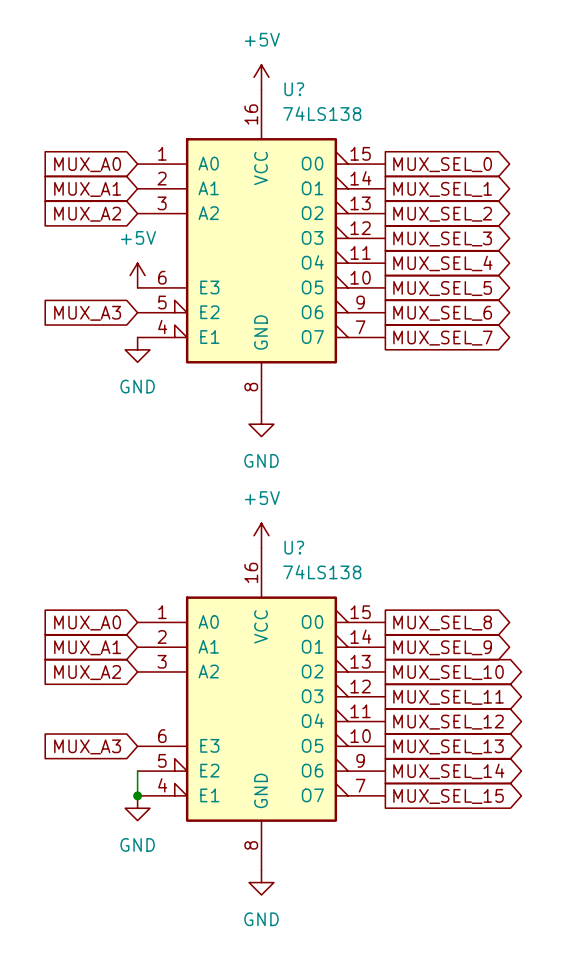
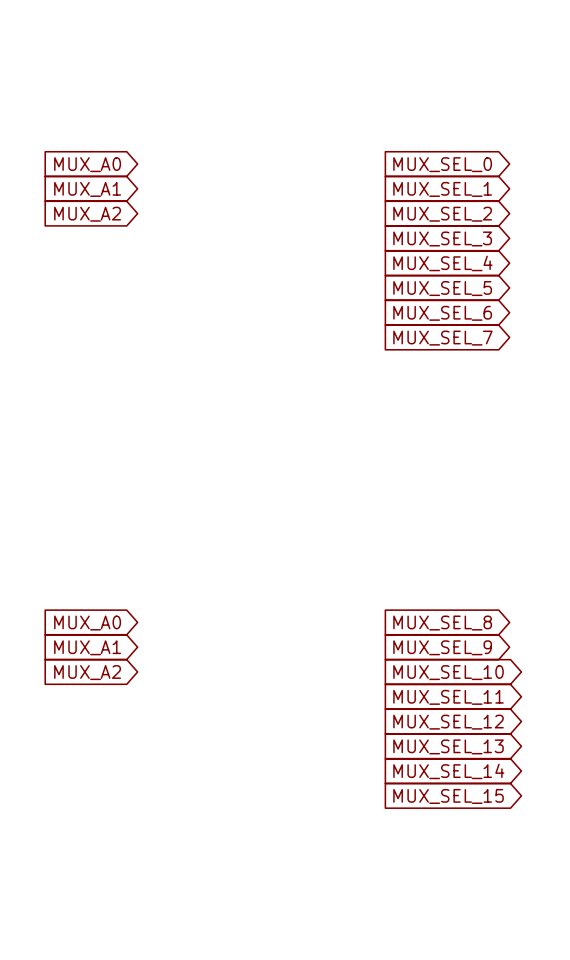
power symbol: +5V (261, 77) -> none
U?: 74LS138 (261, 250) -> none
power symbol: +5V (137, 275) -> none
global label: MUX_A3 (87, 313) -> none
power symbol: GND (137, 349) -> none
power symbol: GND (261, 424) -> none
power symbol: +5V (261, 535) -> none
U?: 74LS138 (261, 709) -> none
global label: MUX_A3 (87, 746) -> none
wire: (137, 771) (137, 795) -> none
junction: (137, 795) -> none
power symbol: GND (137, 808) -> none
power symbol: GND (261, 882) -> none

